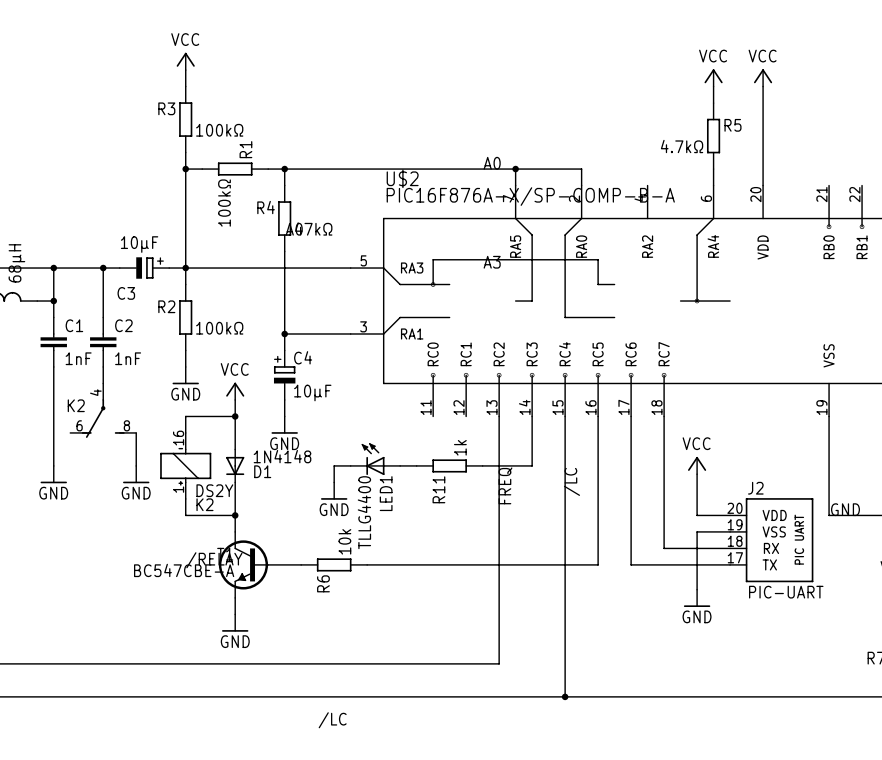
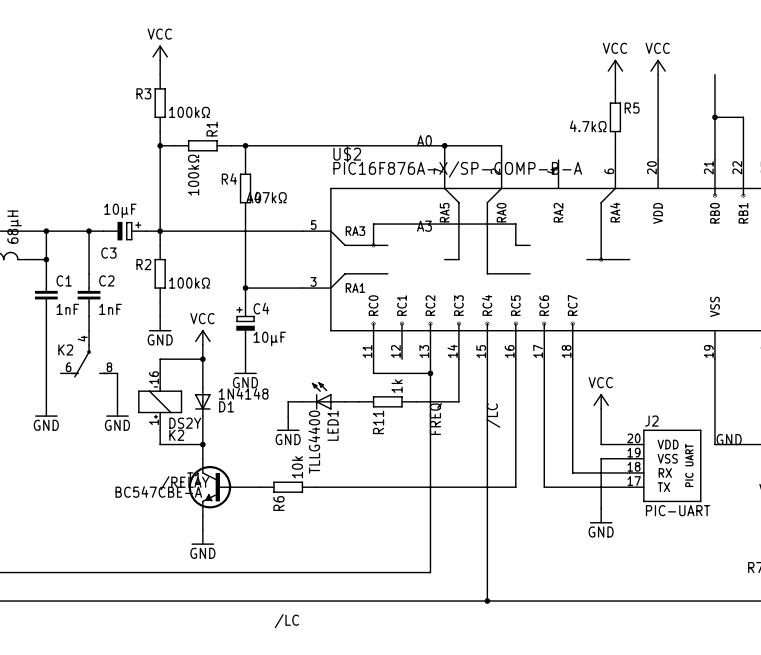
wire: none -> (714, 74) (714, 160)
wire: none -> (714, 117) (743, 117) (743, 160)
junction: none -> (714, 117)
wire: none -> (373, 359) (373, 373) (430, 373)
junction: none -> (430, 373)

